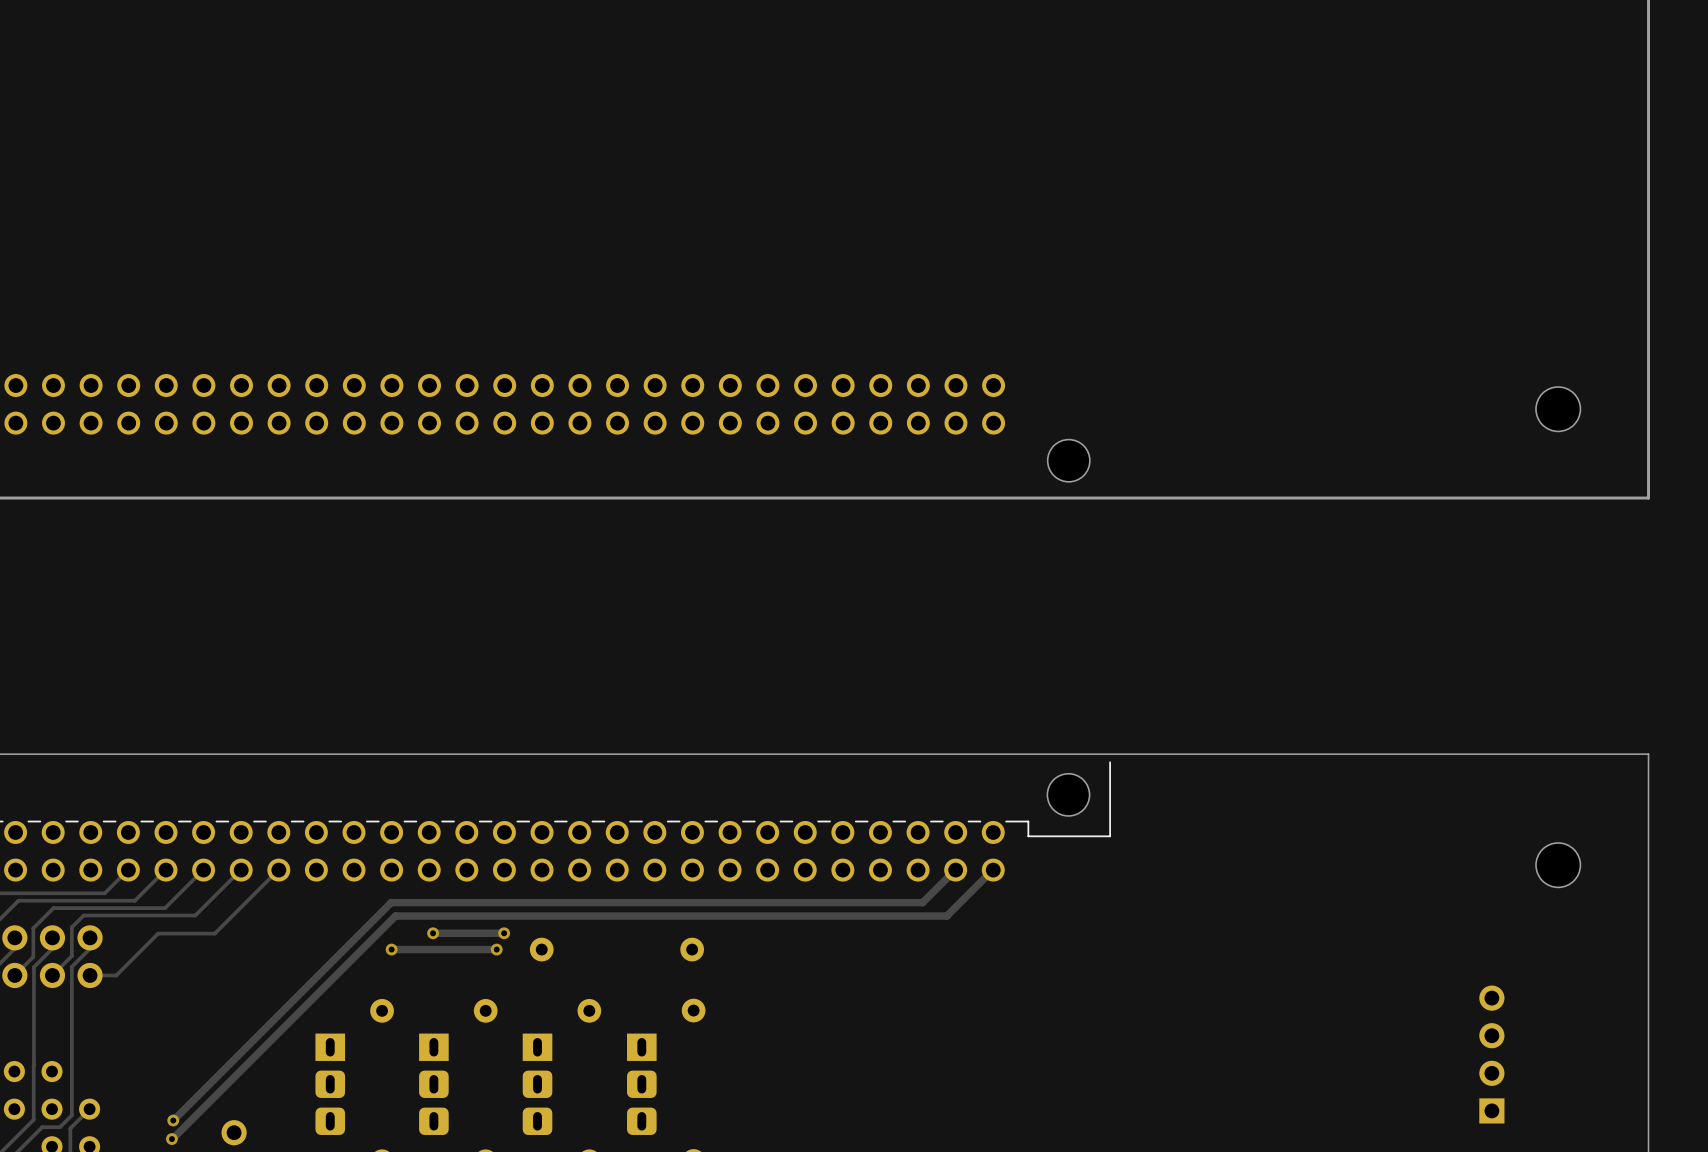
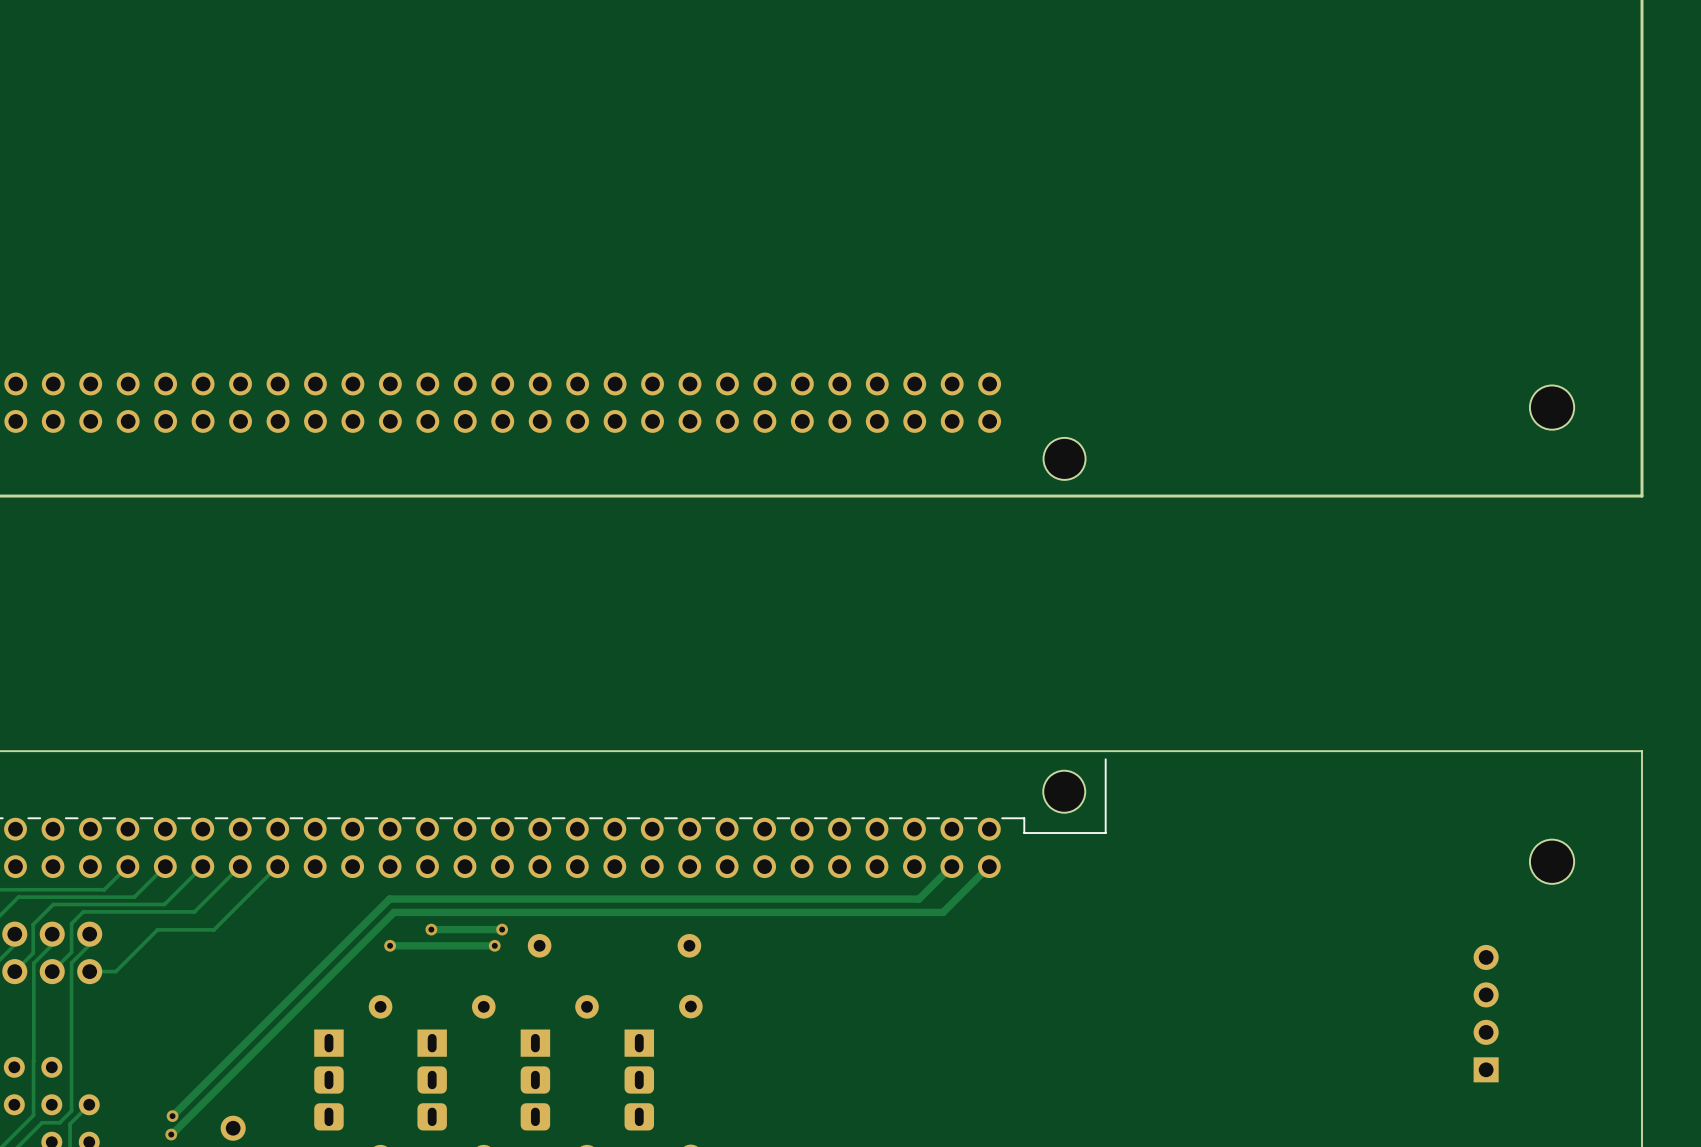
part position: (1491, 1054) -> (1486, 1013)

